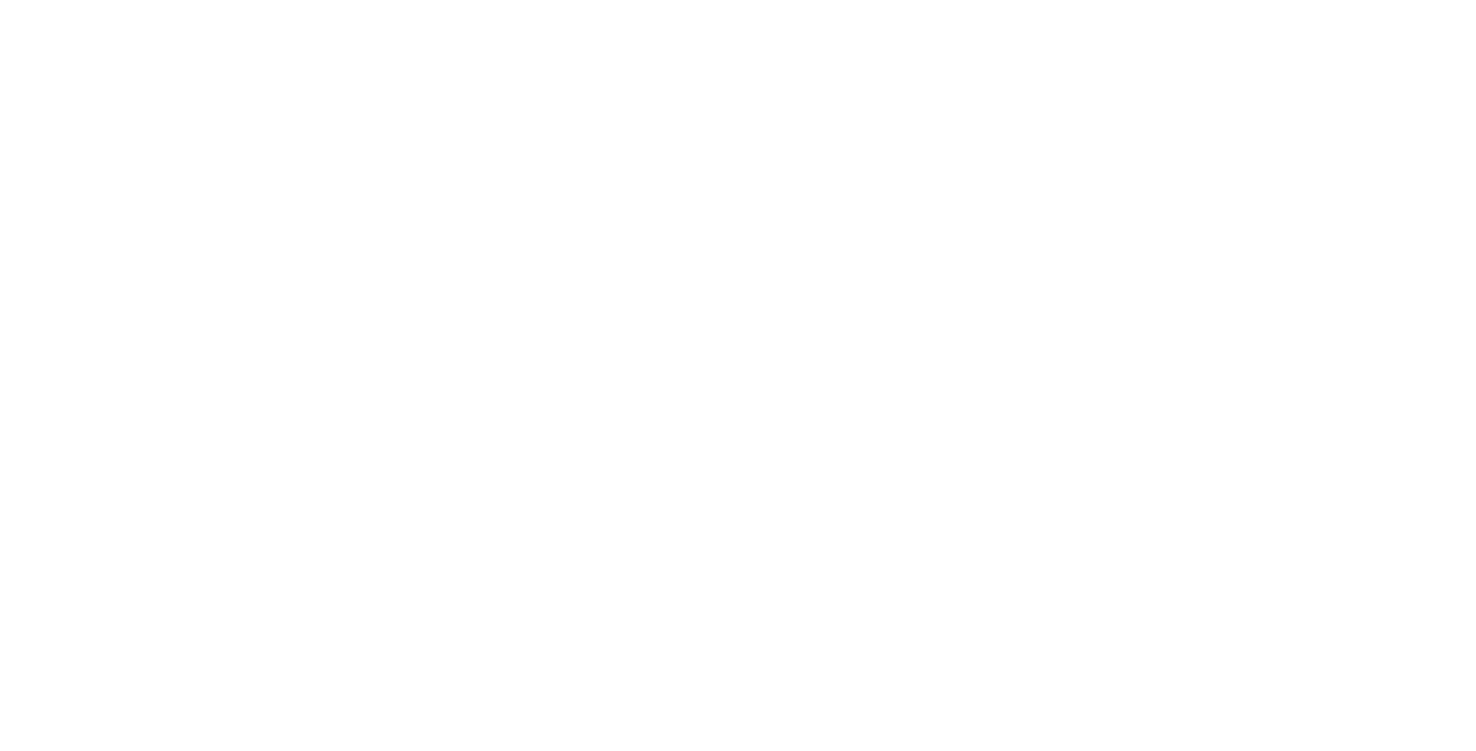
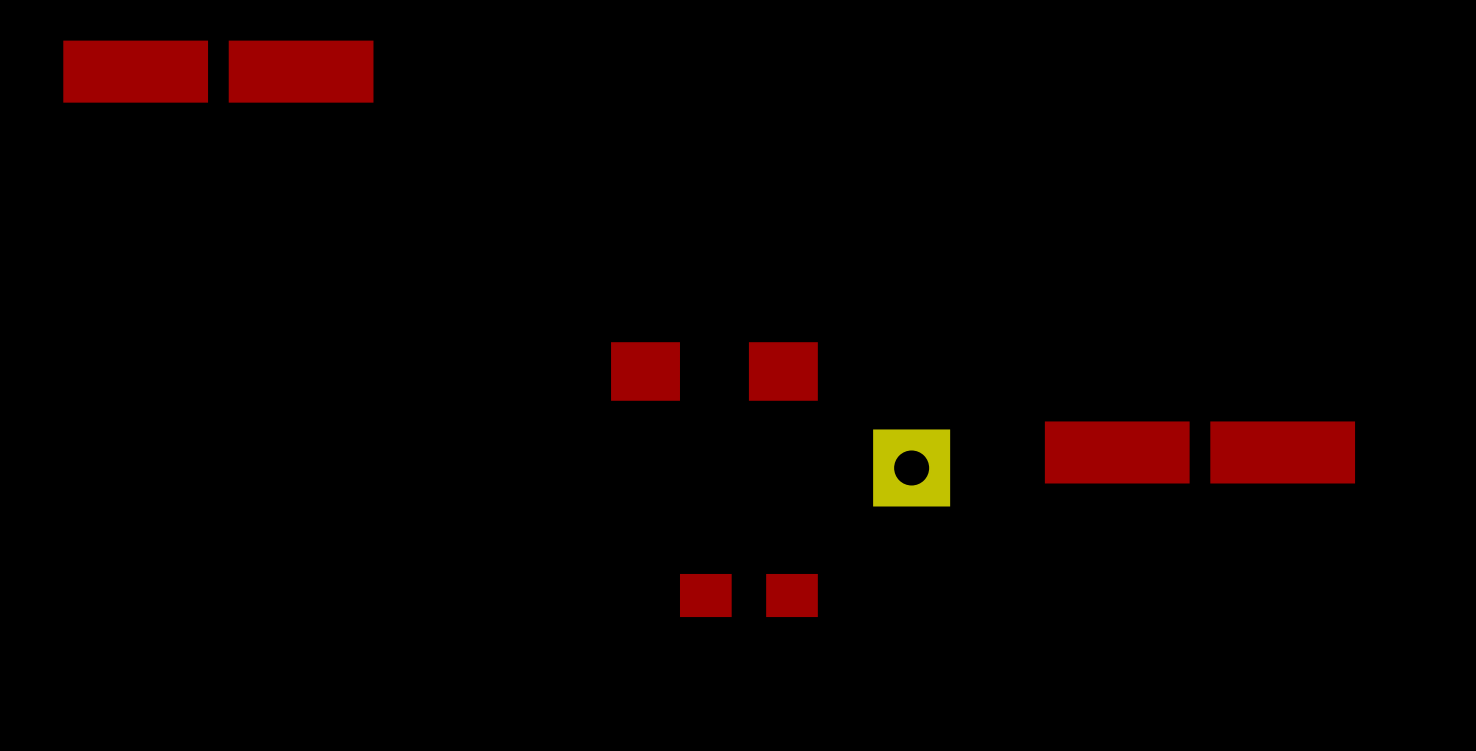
part: none -> (218, 71)
part: none -> (714, 371)
part: none -> (1199, 452)
part: none -> (911, 467)
part: none -> (748, 595)

